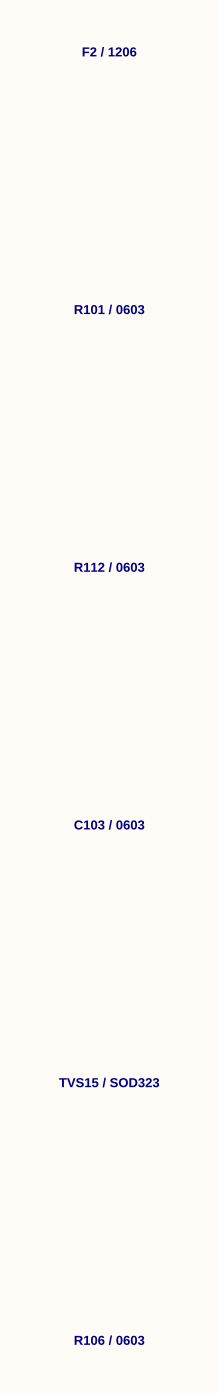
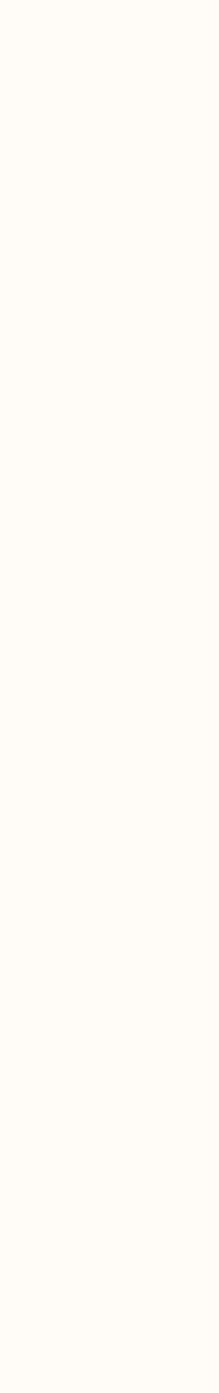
text: F2 / 1206 (109, 51) -> none
text: R101 / 0603 (109, 309) -> none
text: R112 / 0603 (109, 567) -> none
text: C103 / 0603 (109, 824) -> none
text: TVS15 / SOD323 (109, 1082) -> none
text: R106 / 0603 (109, 1340) -> none

